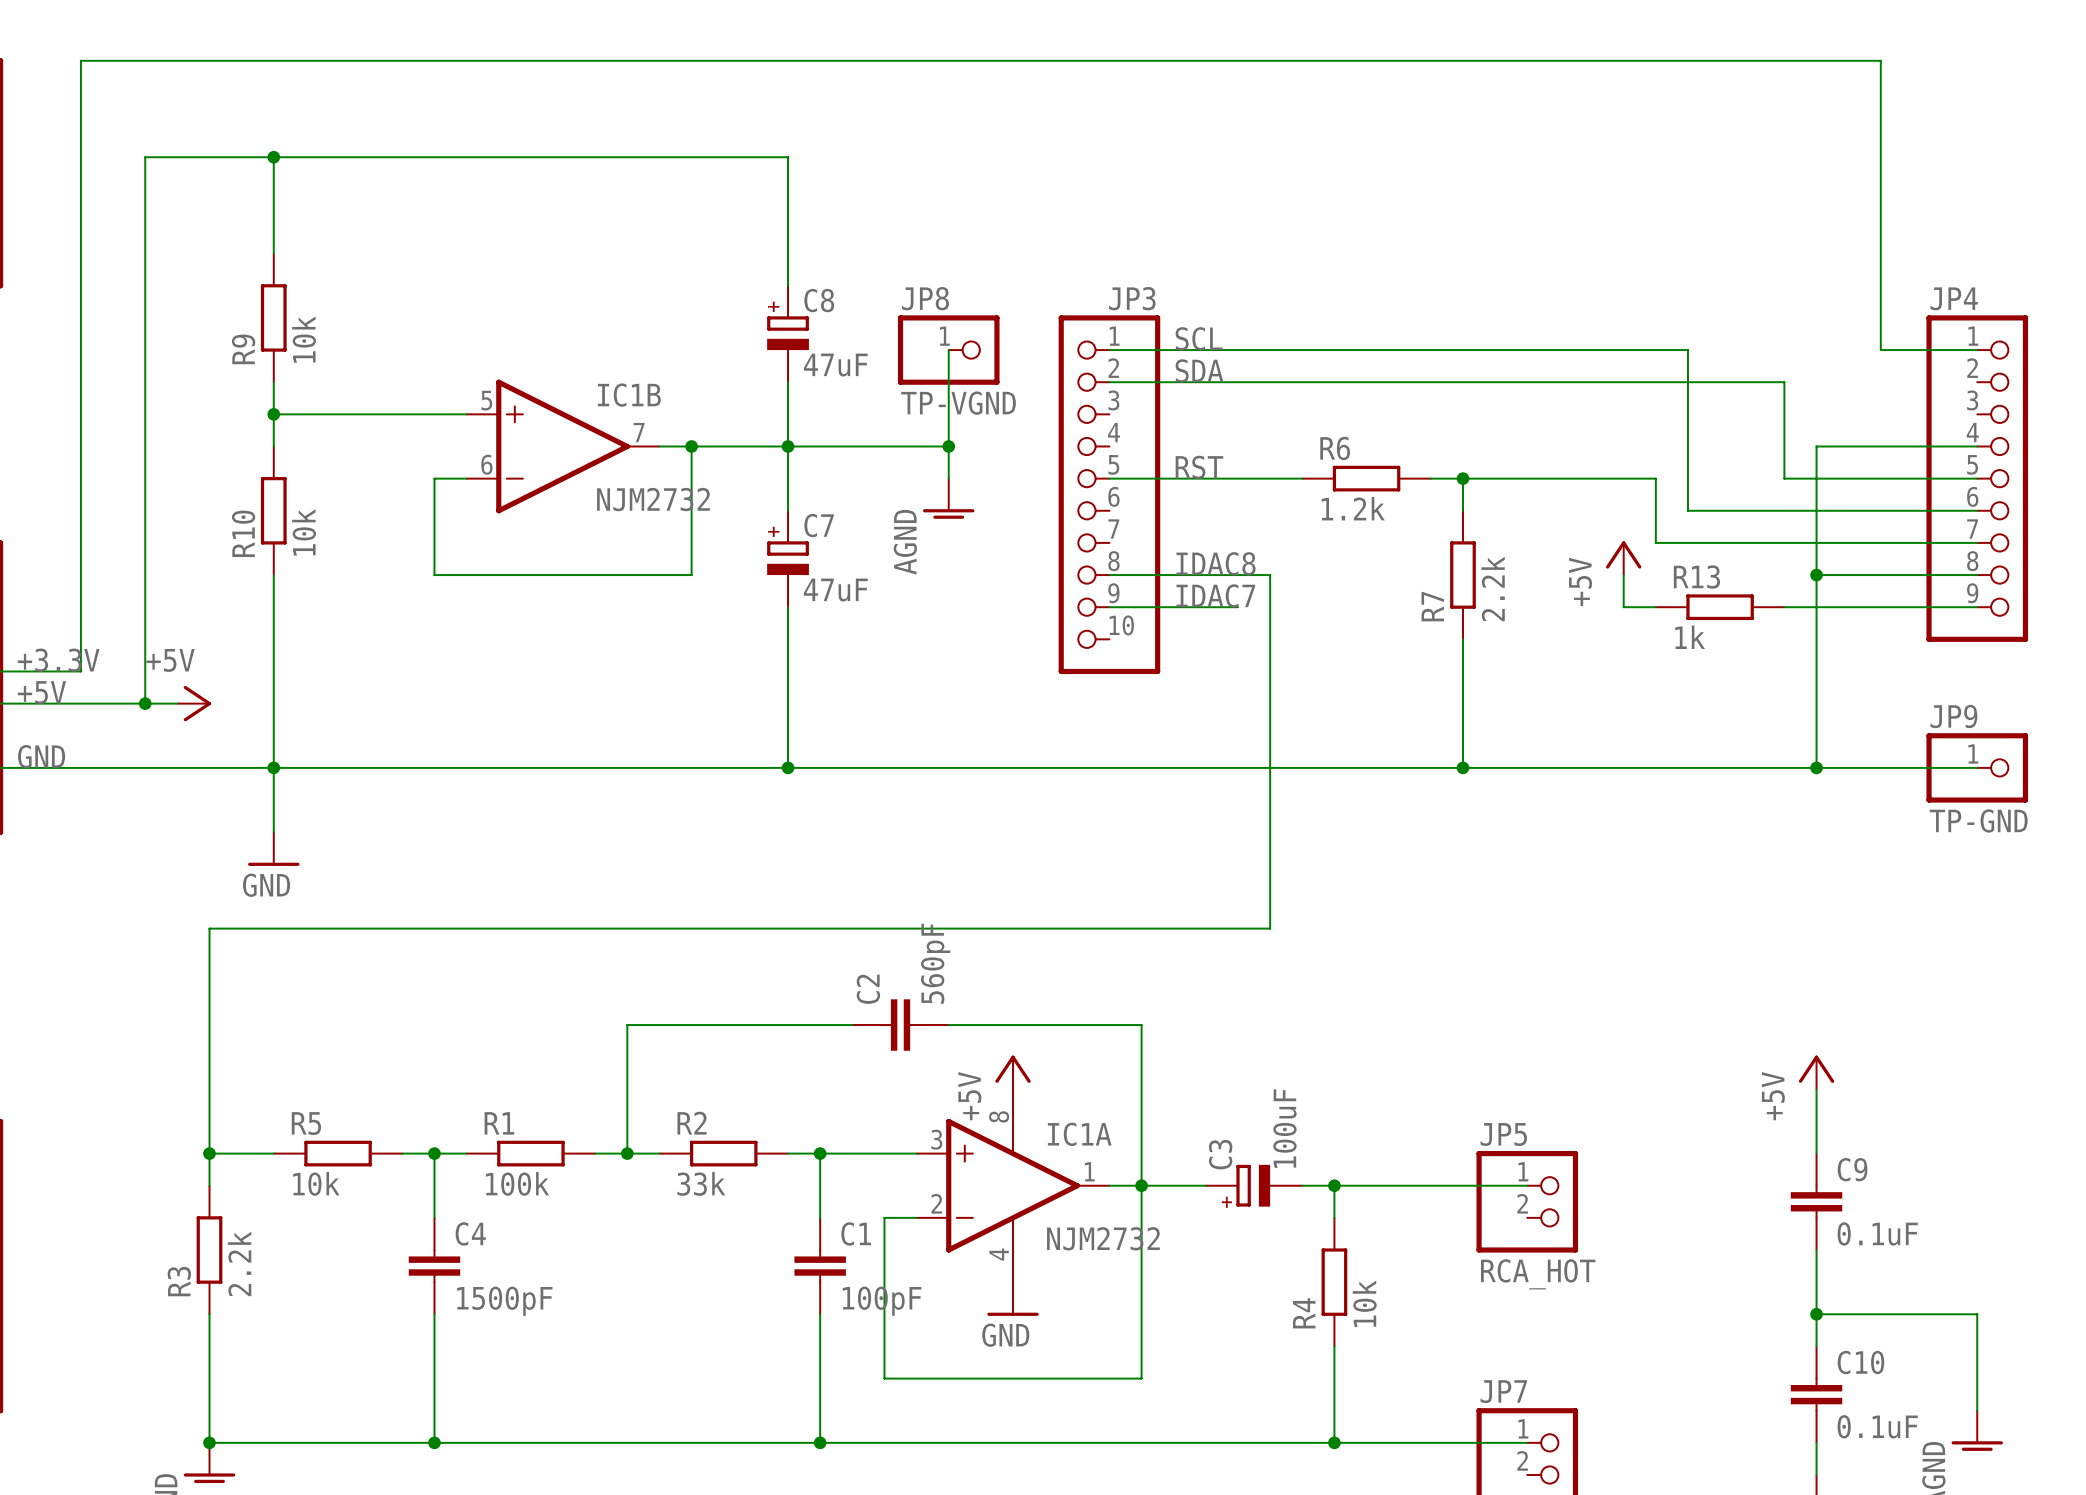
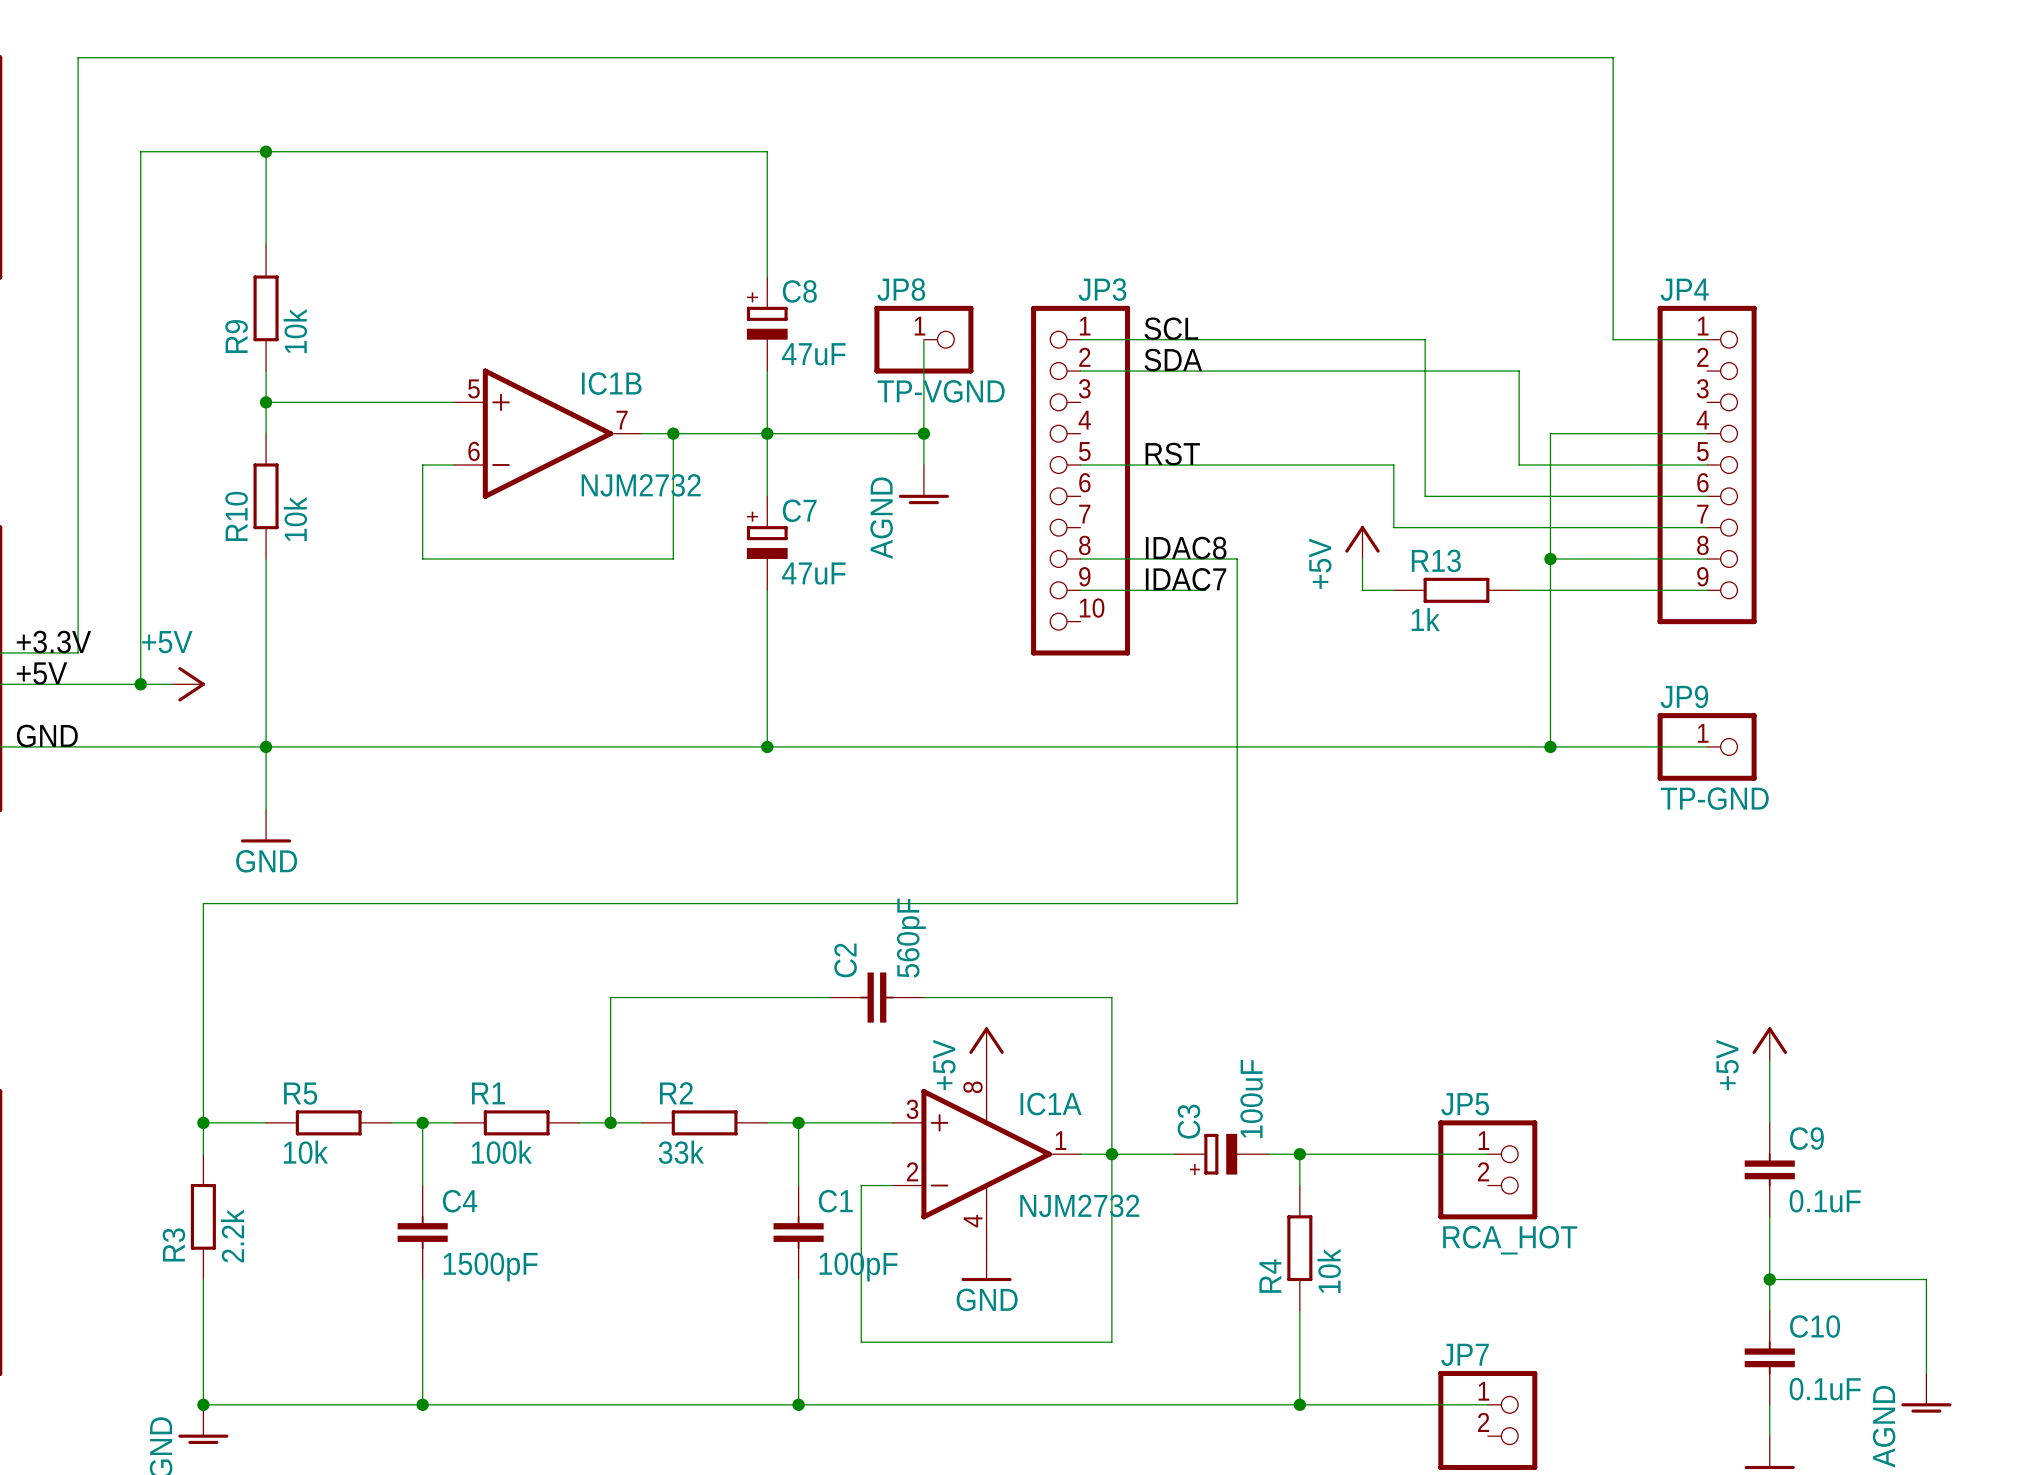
wire: (1655, 60) (1880, 60) (1880, 350) (1977, 350) -> (1613, 57) (1613, 339)
wire: (1462, 350) (1655, 350) -> (1425, 339) (1425, 465)
wire: (1687, 350) (1687, 510) -> (1644, 339) (1707, 339)
wire: (1559, 382) (1784, 382) (1784, 478) (1977, 478) -> none
wire: (1977, 446) (1816, 446) (1816, 767) -> (1707, 433) (1550, 433) (1550, 746)
wire: none -> (1268, 465) (1393, 465) (1393, 527) (1613, 527)
R6: 1.2k (1366, 478) -> none
wire: (1430, 478) (1559, 478) -> (1519, 371) (1519, 465)
junction: (1462, 478) -> none
wire: (1655, 478) (1655, 542) -> (1613, 465) (1707, 465)
JP4 position: (1977, 478) -> (1707, 465)
wire: (1752, 510) (1977, 510) -> (1425, 496) (1644, 496)
wire: (1752, 542) (1977, 542) -> none
power symbol position: +5V (1623, 558) -> +5V (1362, 542)
wire: none -> (1362, 558) (1362, 590) (1393, 590)
R7: 2.2k (1462, 575) -> none
junction: none -> (1550, 558)
wire: (1623, 575) (1623, 607) -> (1519, 590) (1581, 590)
wire: (1816, 575) (1977, 575) -> (1550, 558) (1707, 558)
junction: (1816, 575) -> none
wire: none -> (1613, 590) (1707, 590)
R13 position: (1720, 607) -> (1456, 590)
wire: (1784, 607) (1977, 607) -> none
wire: (1462, 639) (1462, 767) -> none
junction: (1462, 767) -> none
junction: none -> (1550, 746)
wire: (1752, 767) (1977, 767) -> none
junction: (1816, 767) -> none
JP9 position: (1977, 767) -> (1707, 746)

